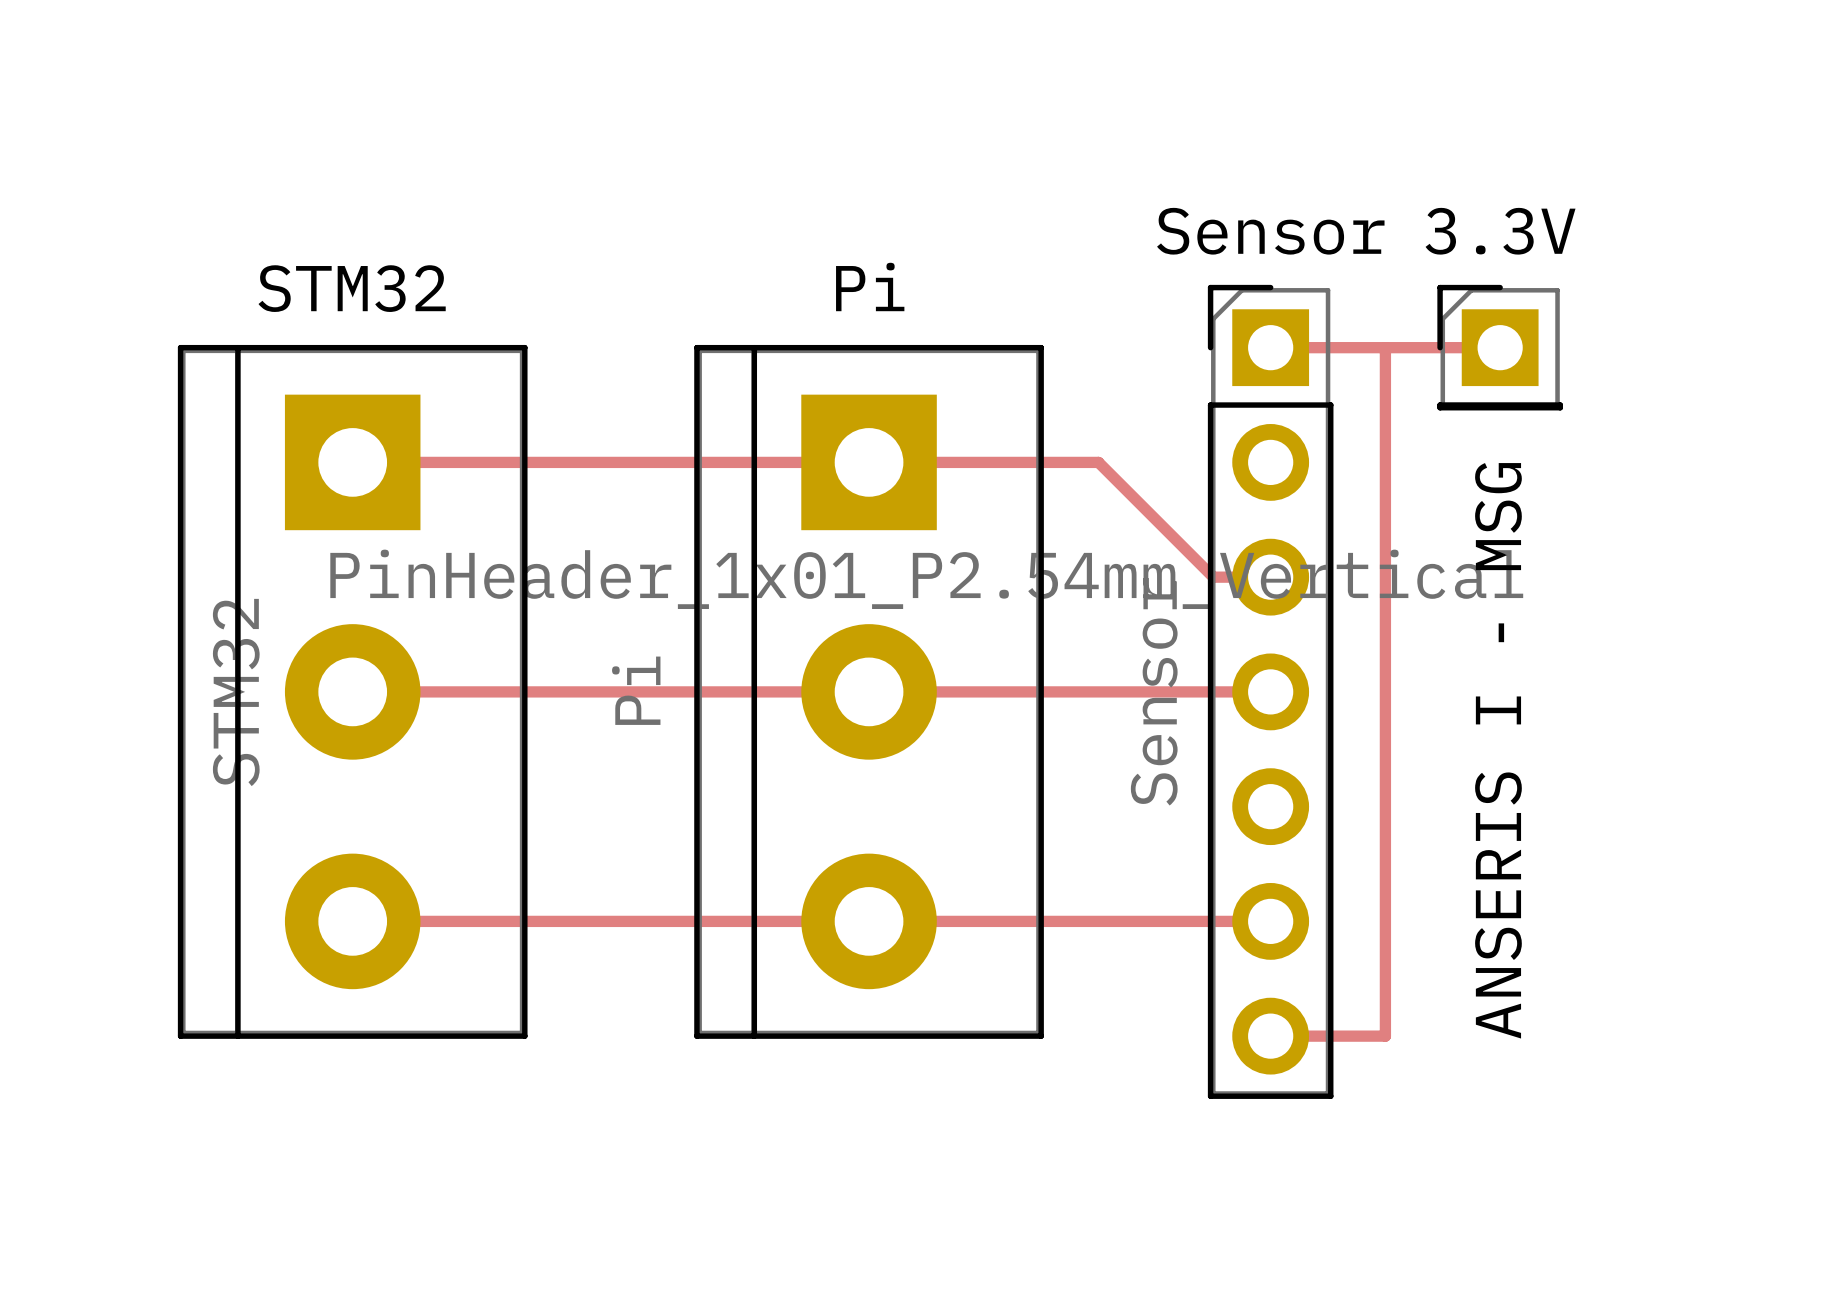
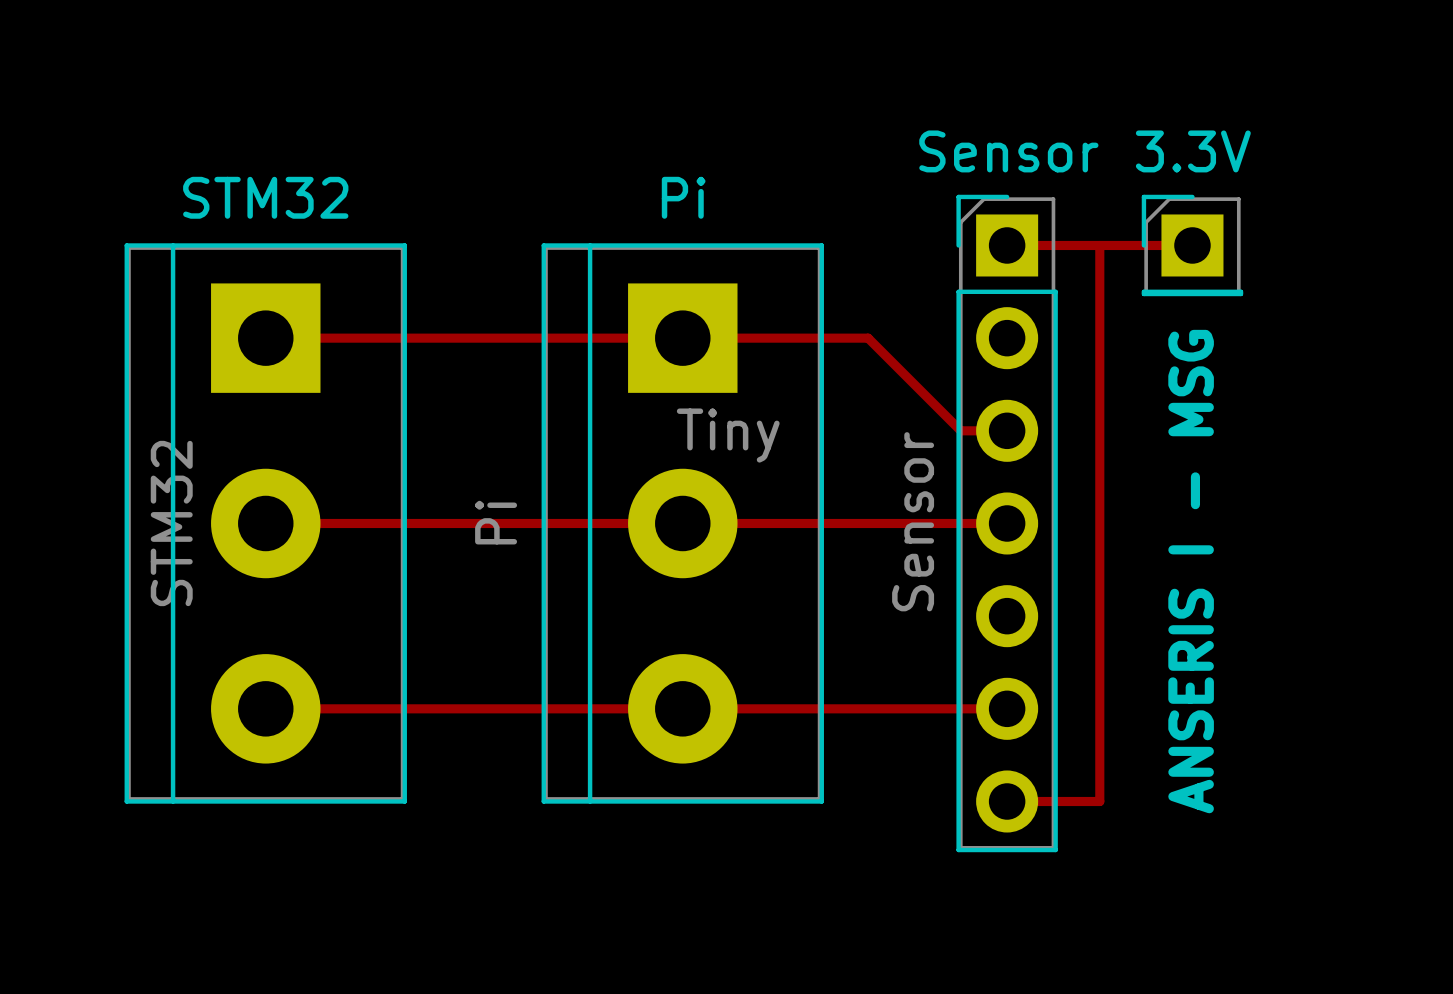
3.3V value: PinHeader_1x01_P2.54mm_Vertical (926, 579) -> Tiny (728, 435)

